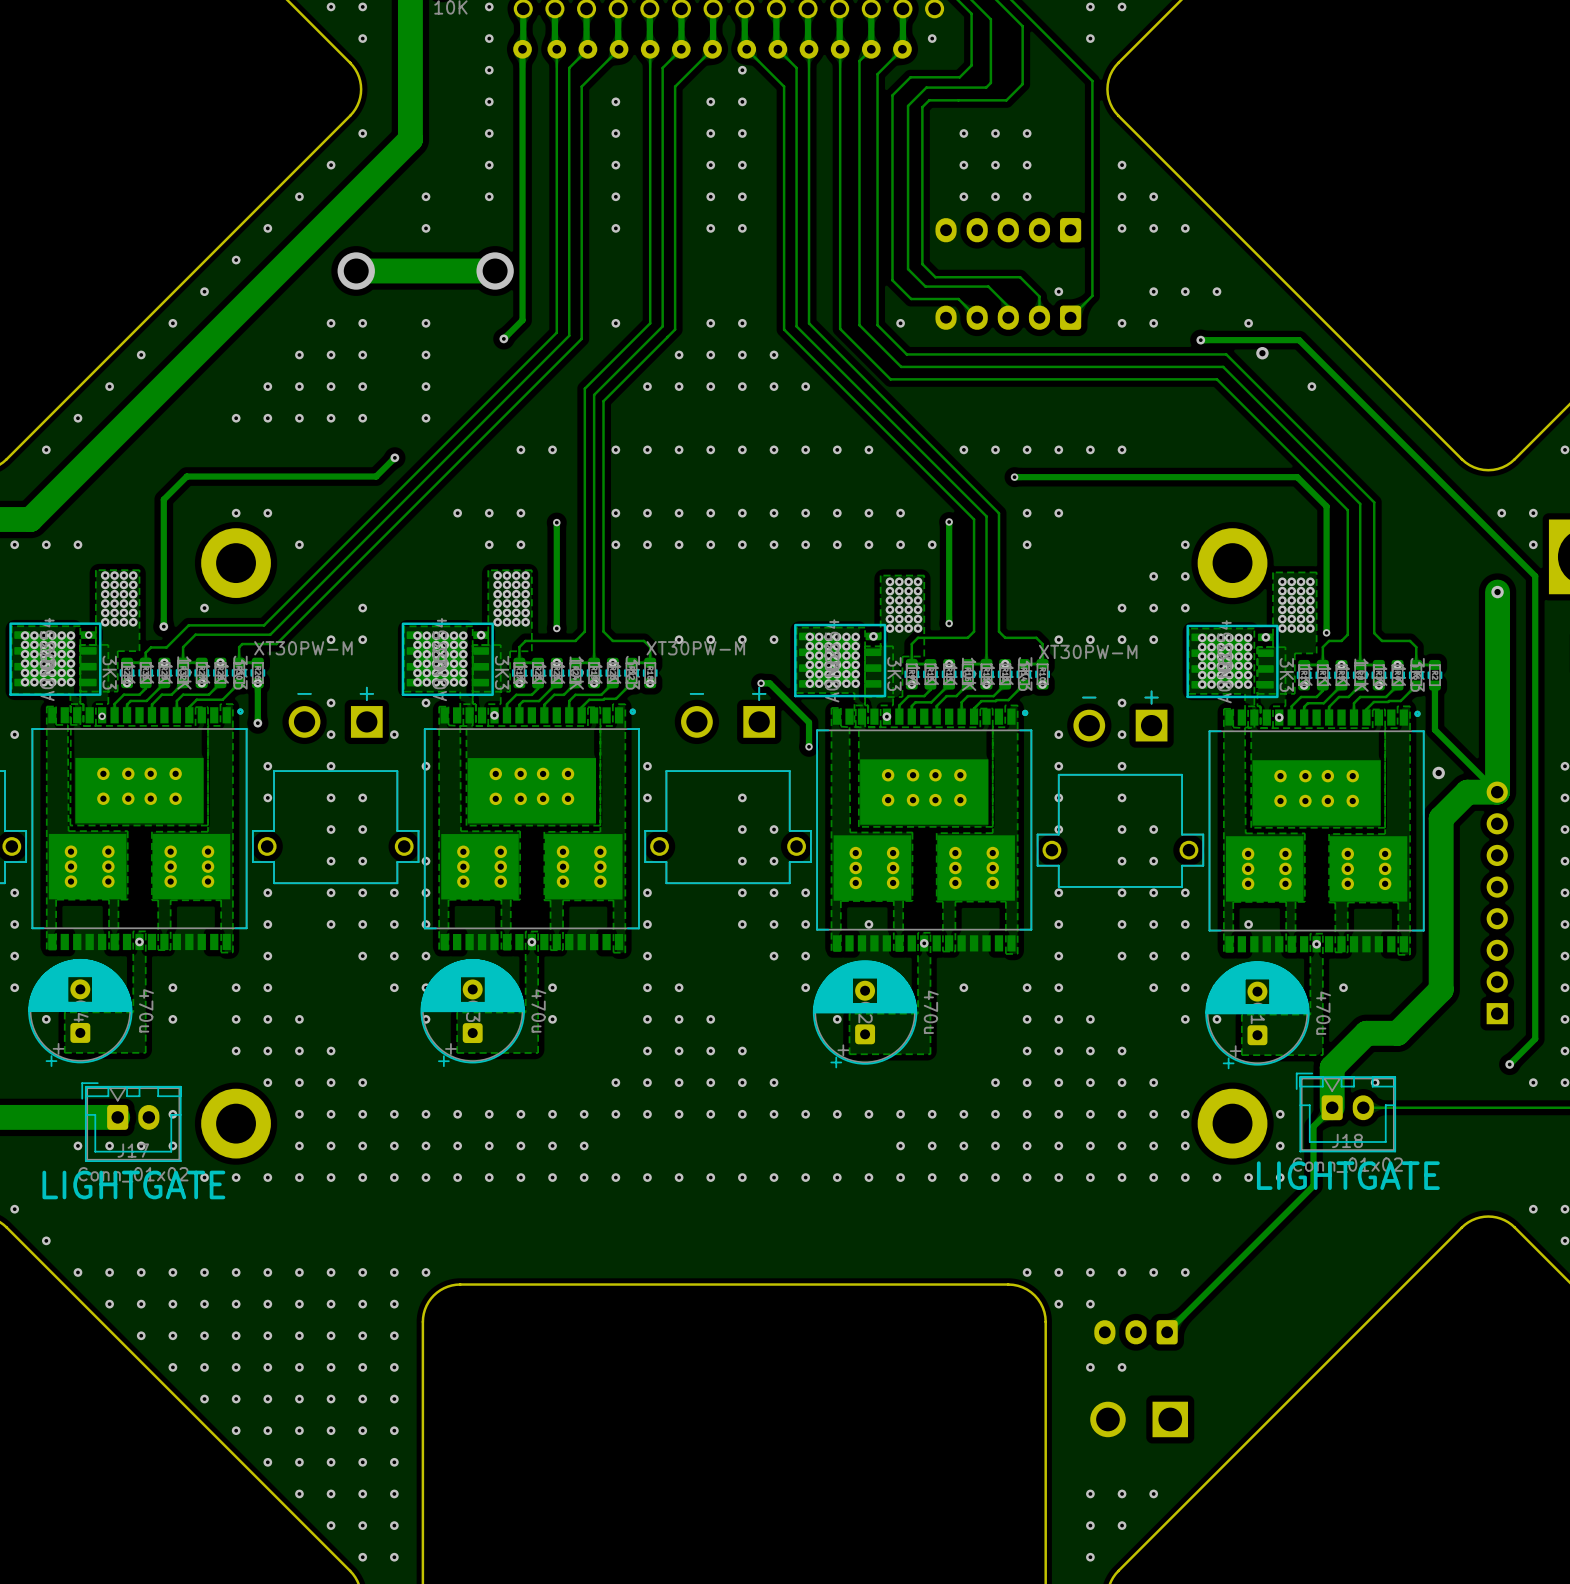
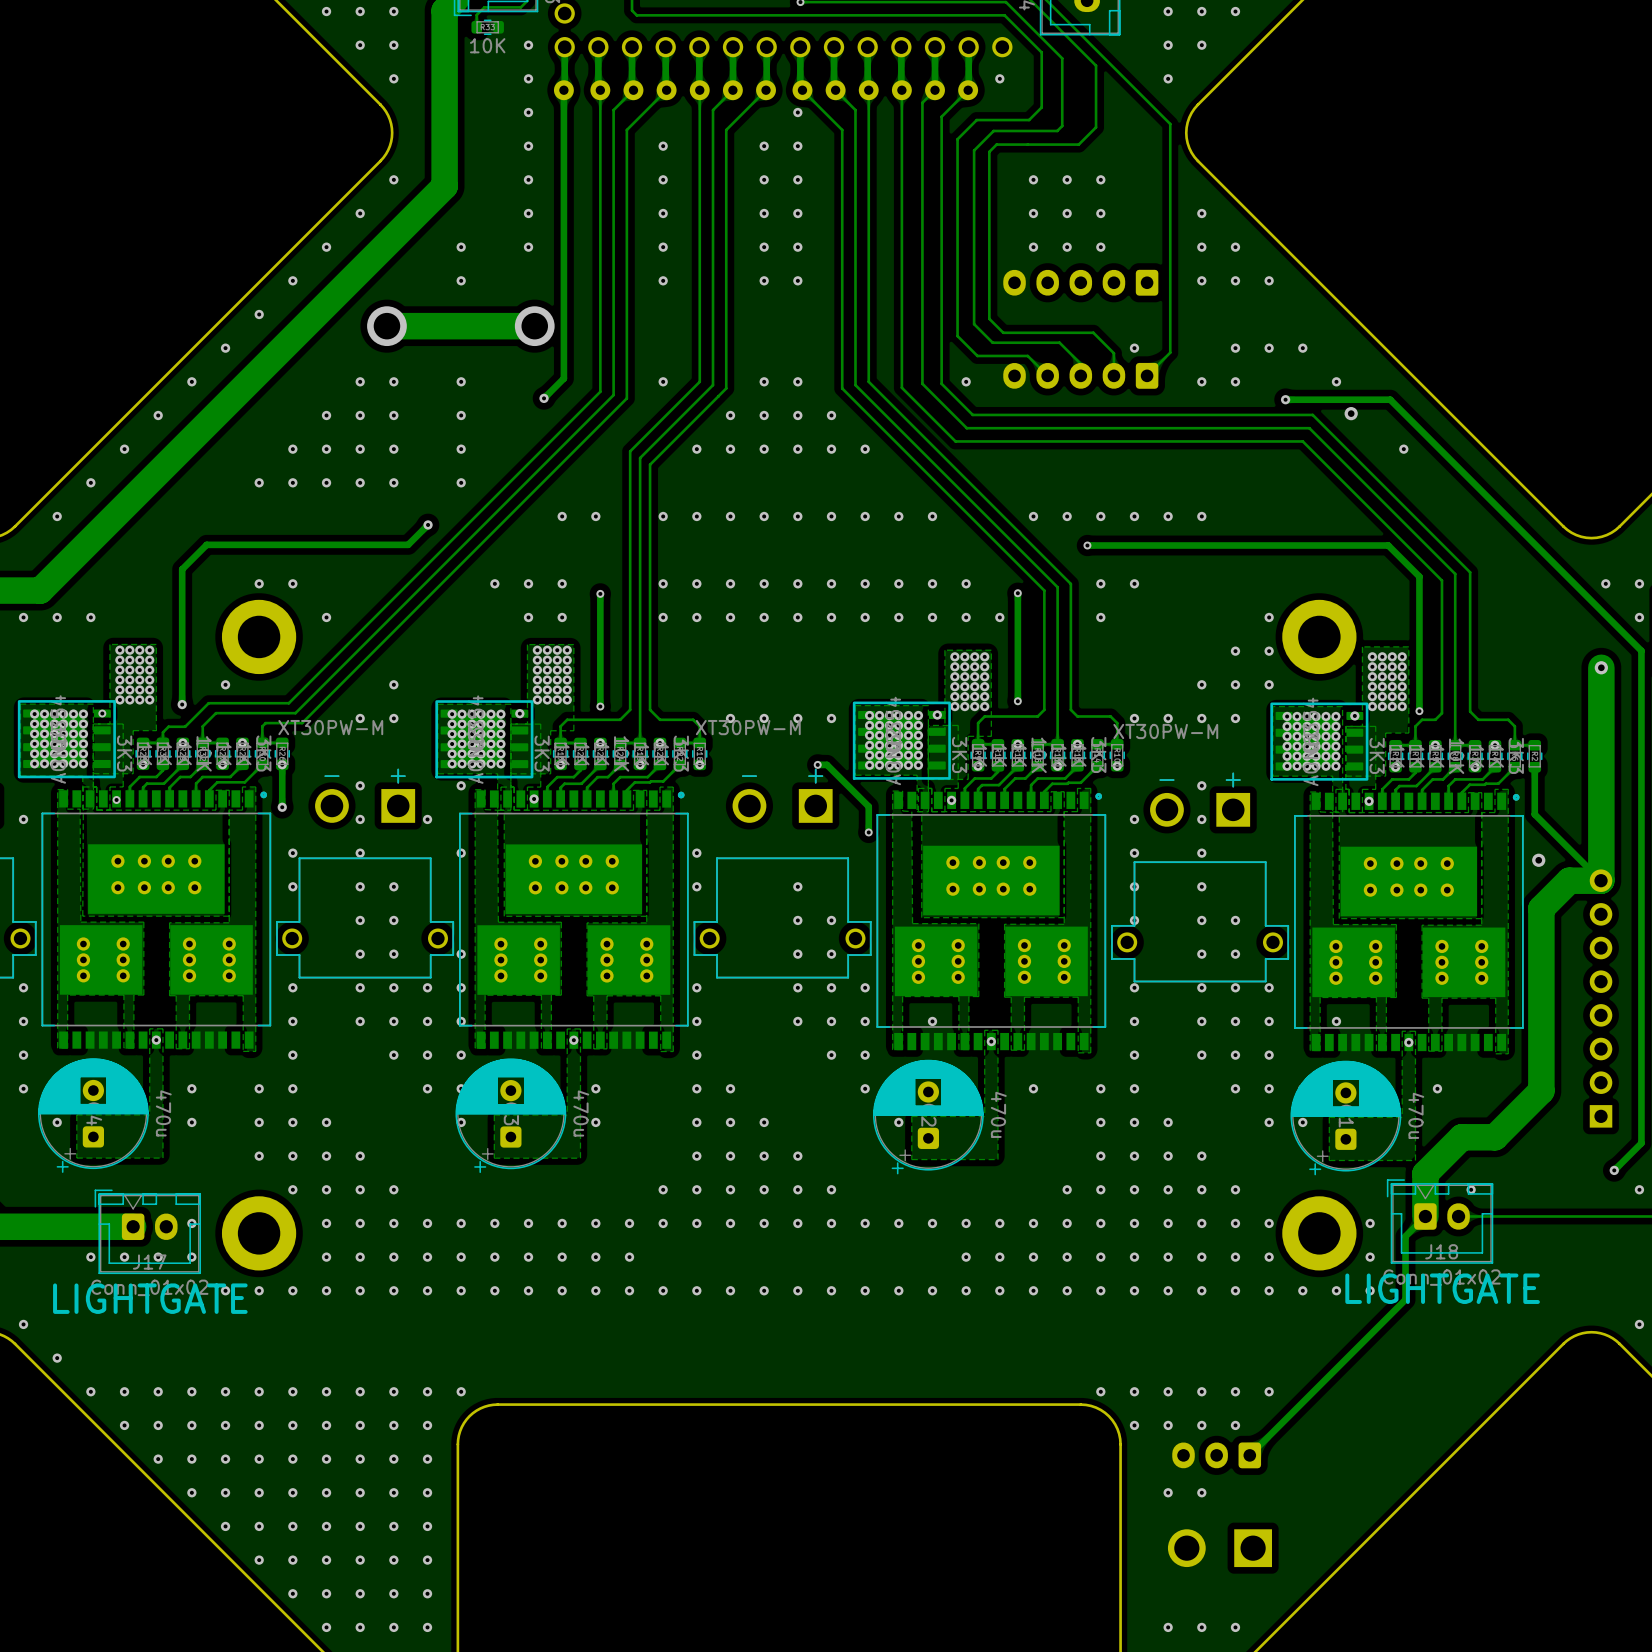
via: none -> (1201, 1425)
via: none -> (1235, 1425)

